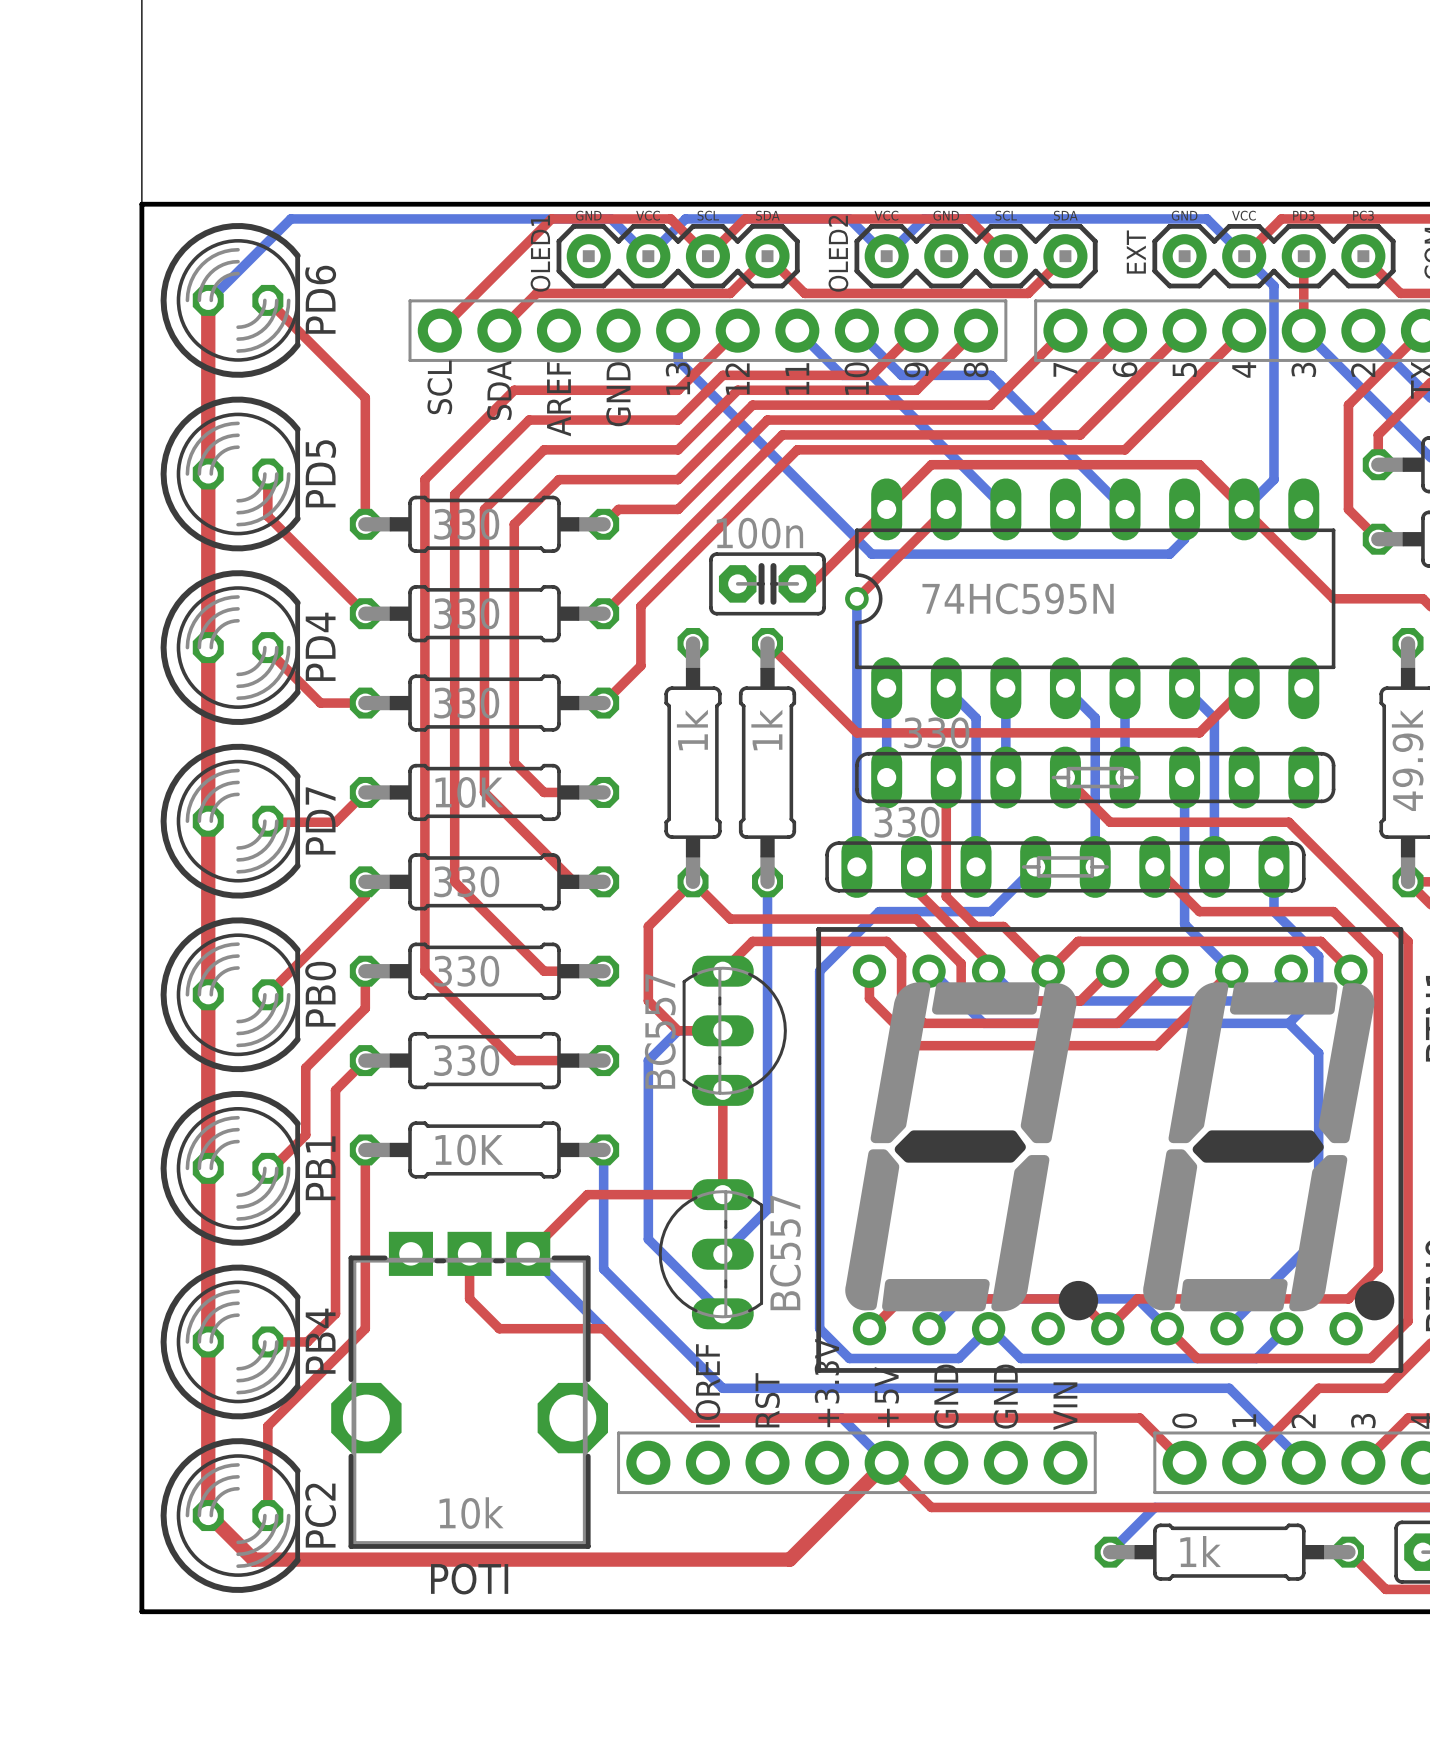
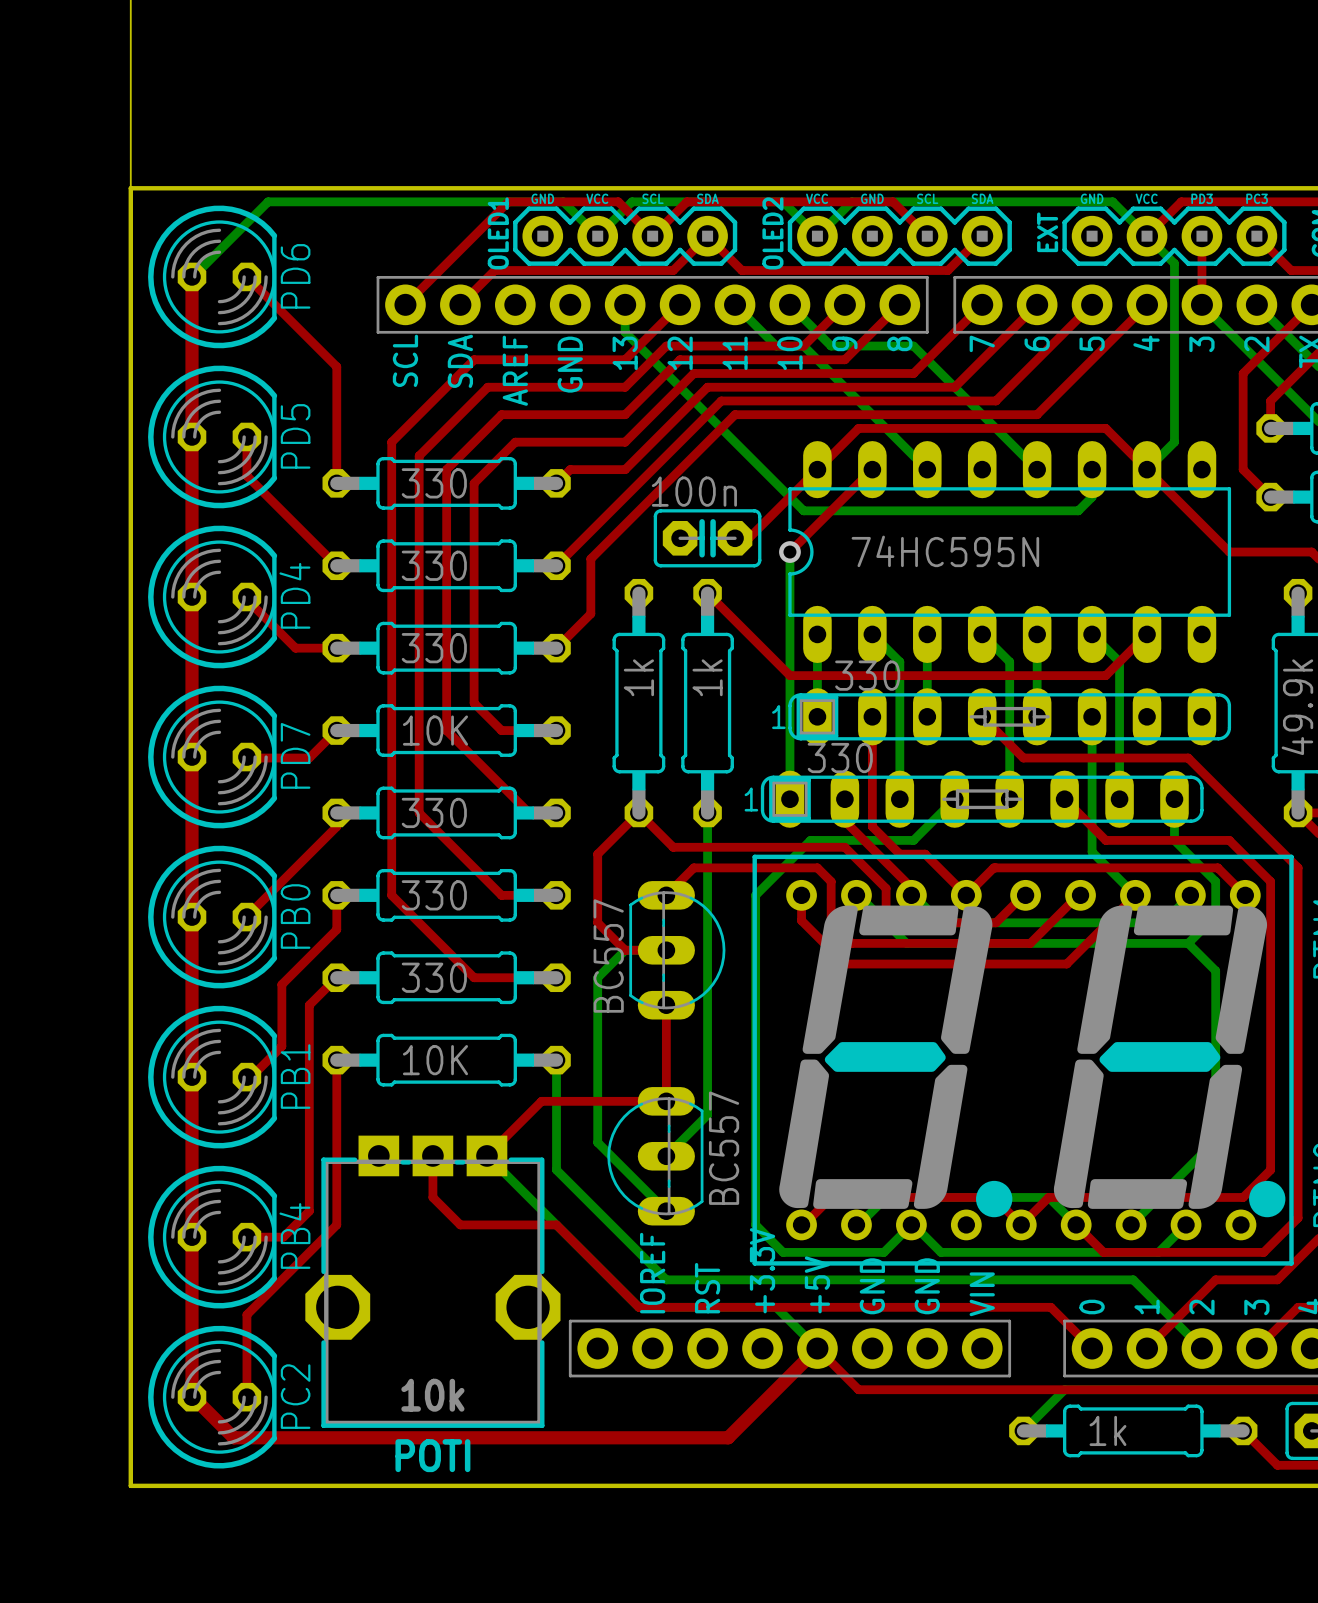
part footprint: [855, 746, 1336, 809] -> [788, 688, 1232, 746]
part footprint: [825, 835, 1306, 898] -> [760, 770, 1204, 828]

